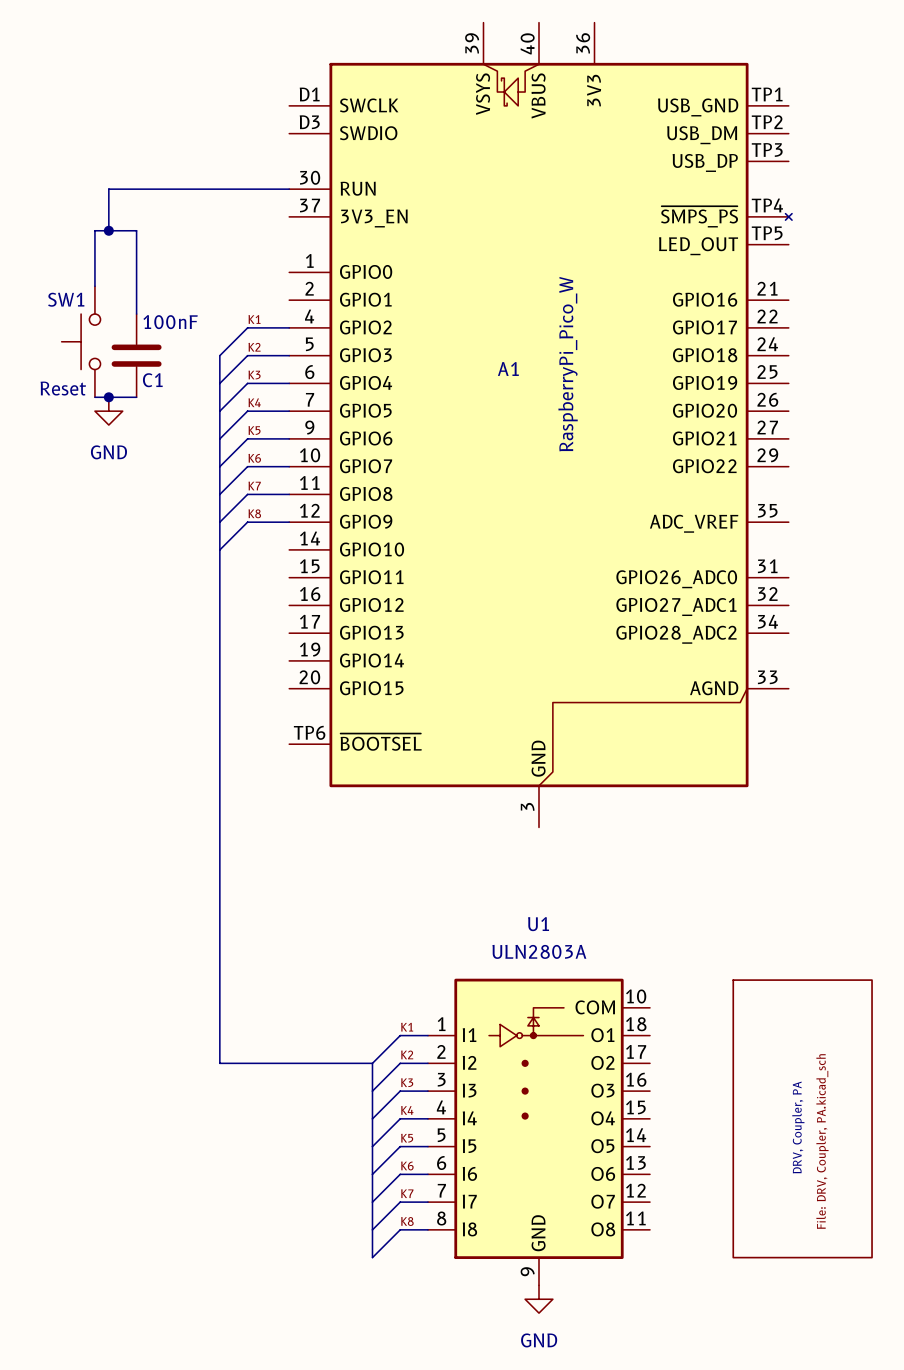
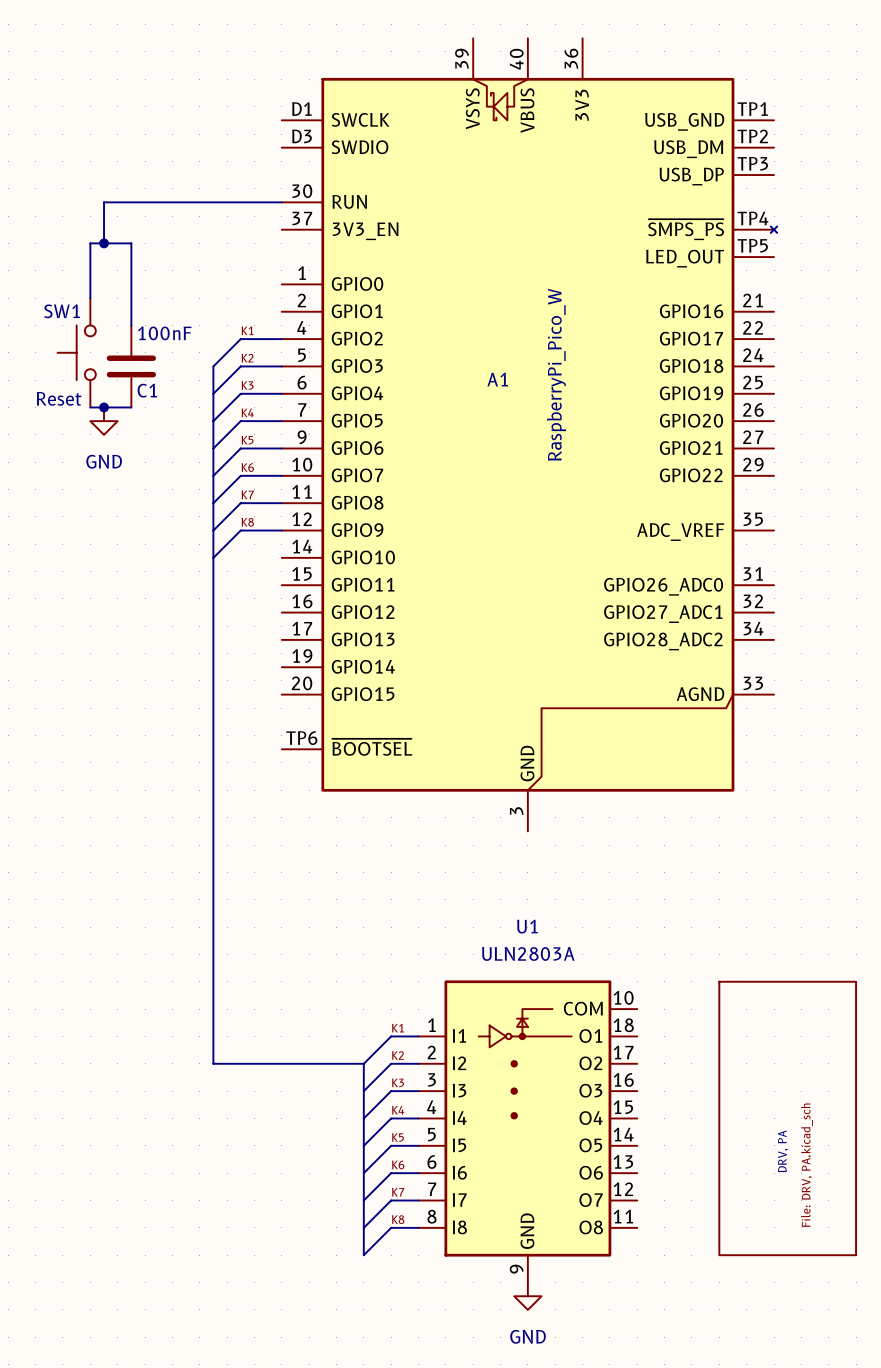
sheet DRV, Coupler, PA name: DRV, Coupler, PA (798, 1127) -> DRV, PA (783, 1151)
sheet DRV, Coupler, PA value: File: DRV, Coupler, PA.kicad_sch (822, 1141) -> File: DRV, PA.kicad_sch (807, 1165)

